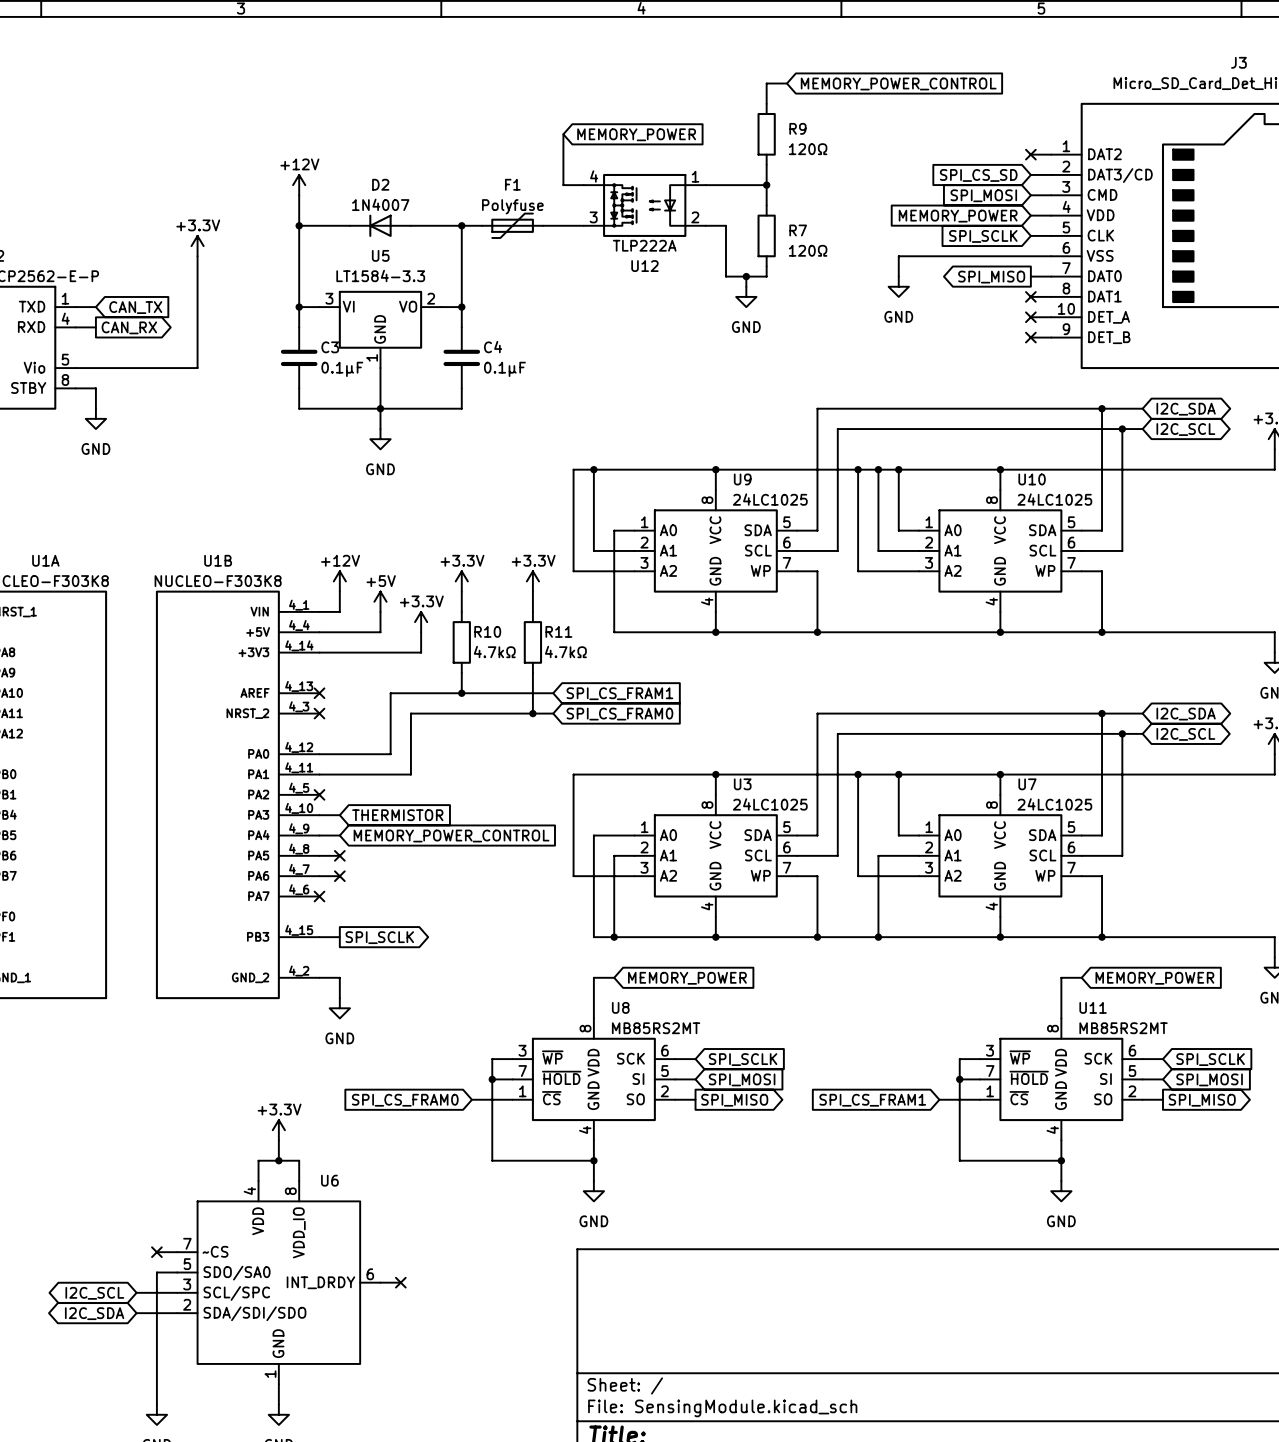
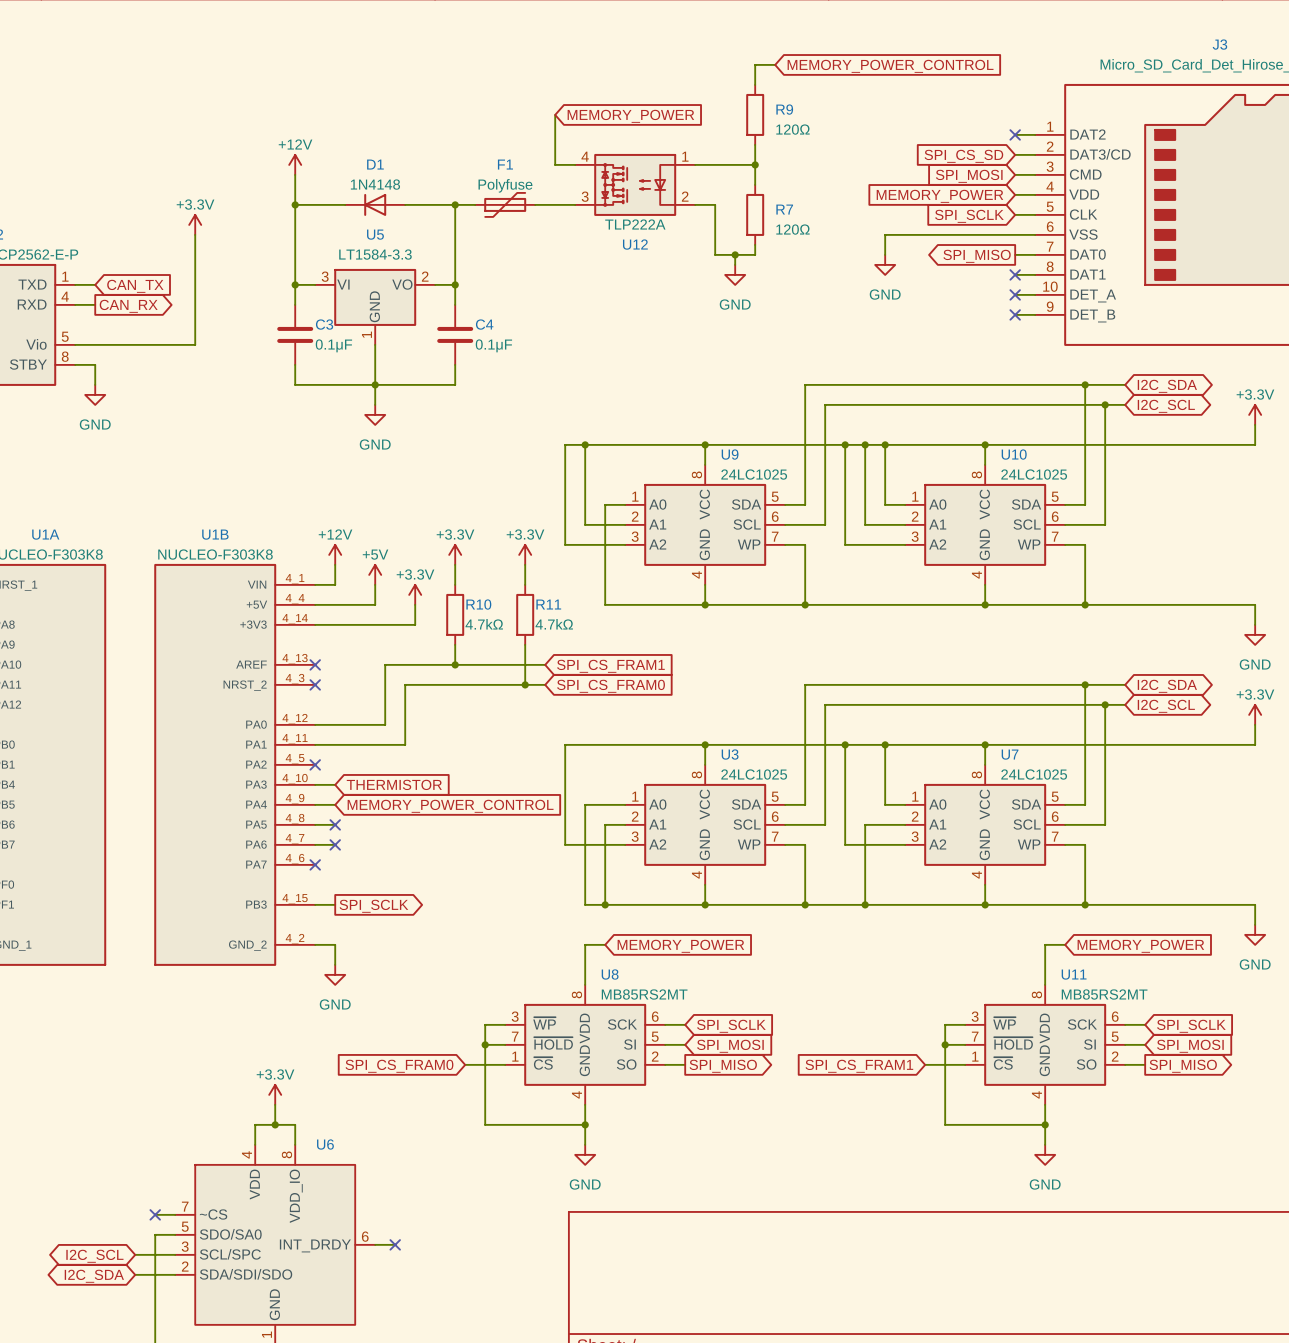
D2 name: D2 (380, 184) -> D1 (375, 164)
D2 value: 1N4007 (380, 204) -> 1N4148 (375, 184)

